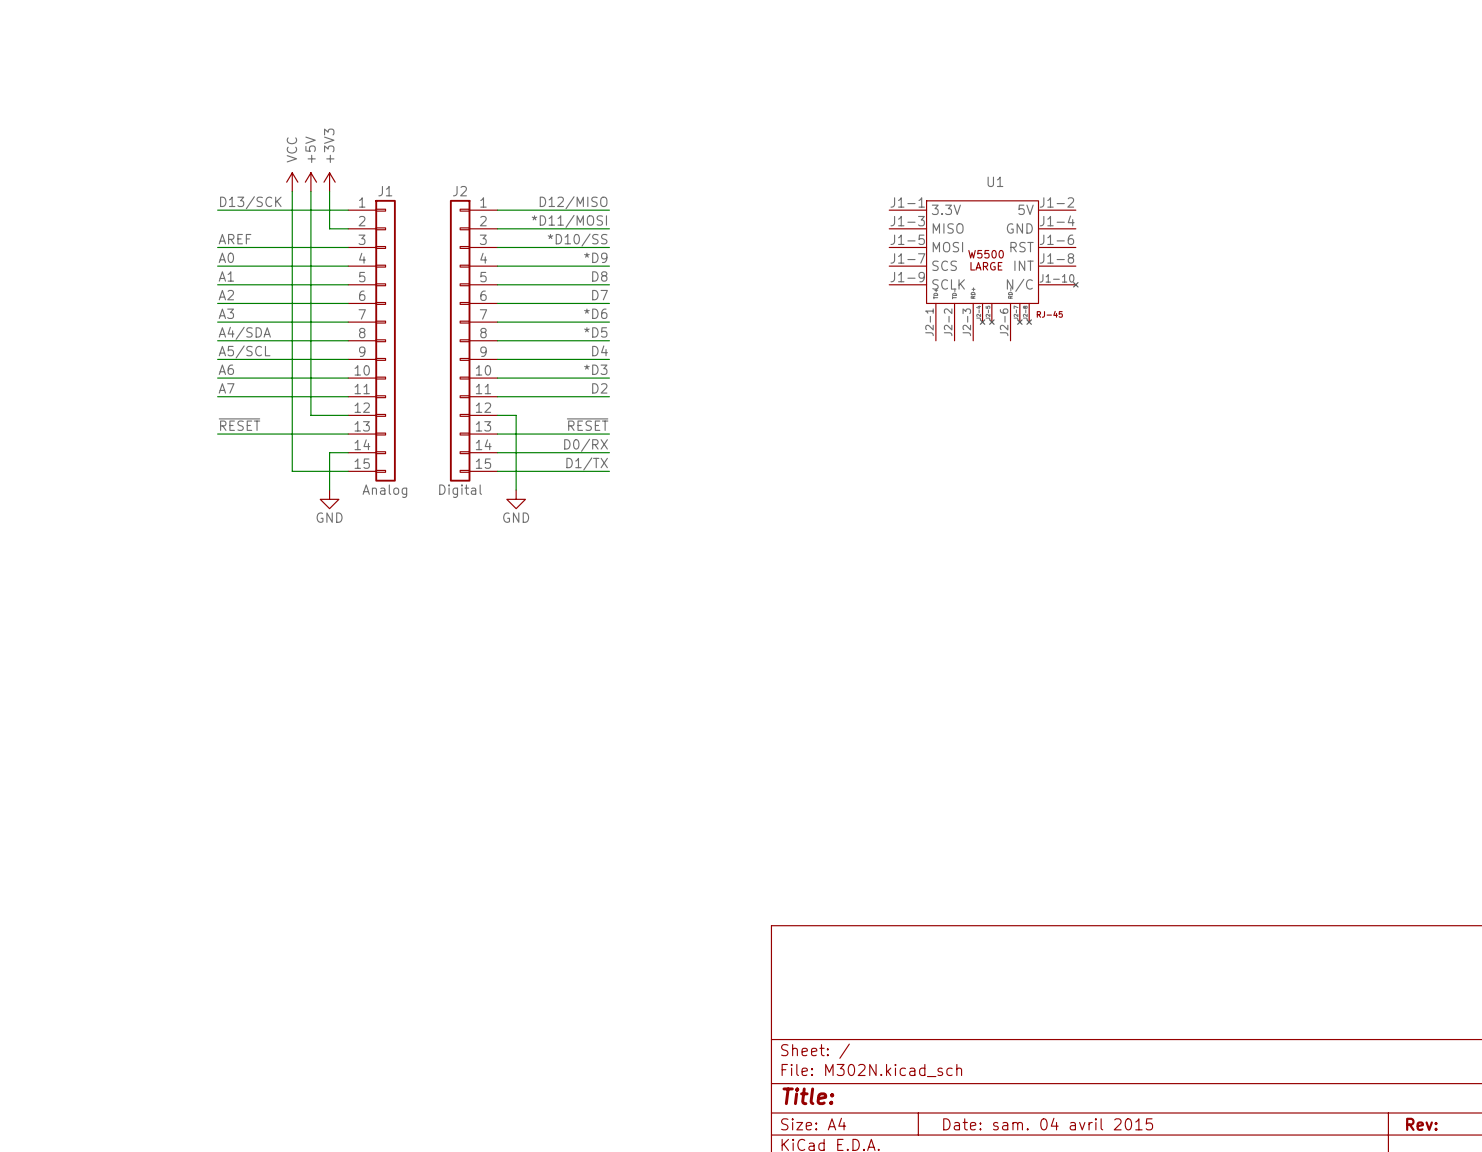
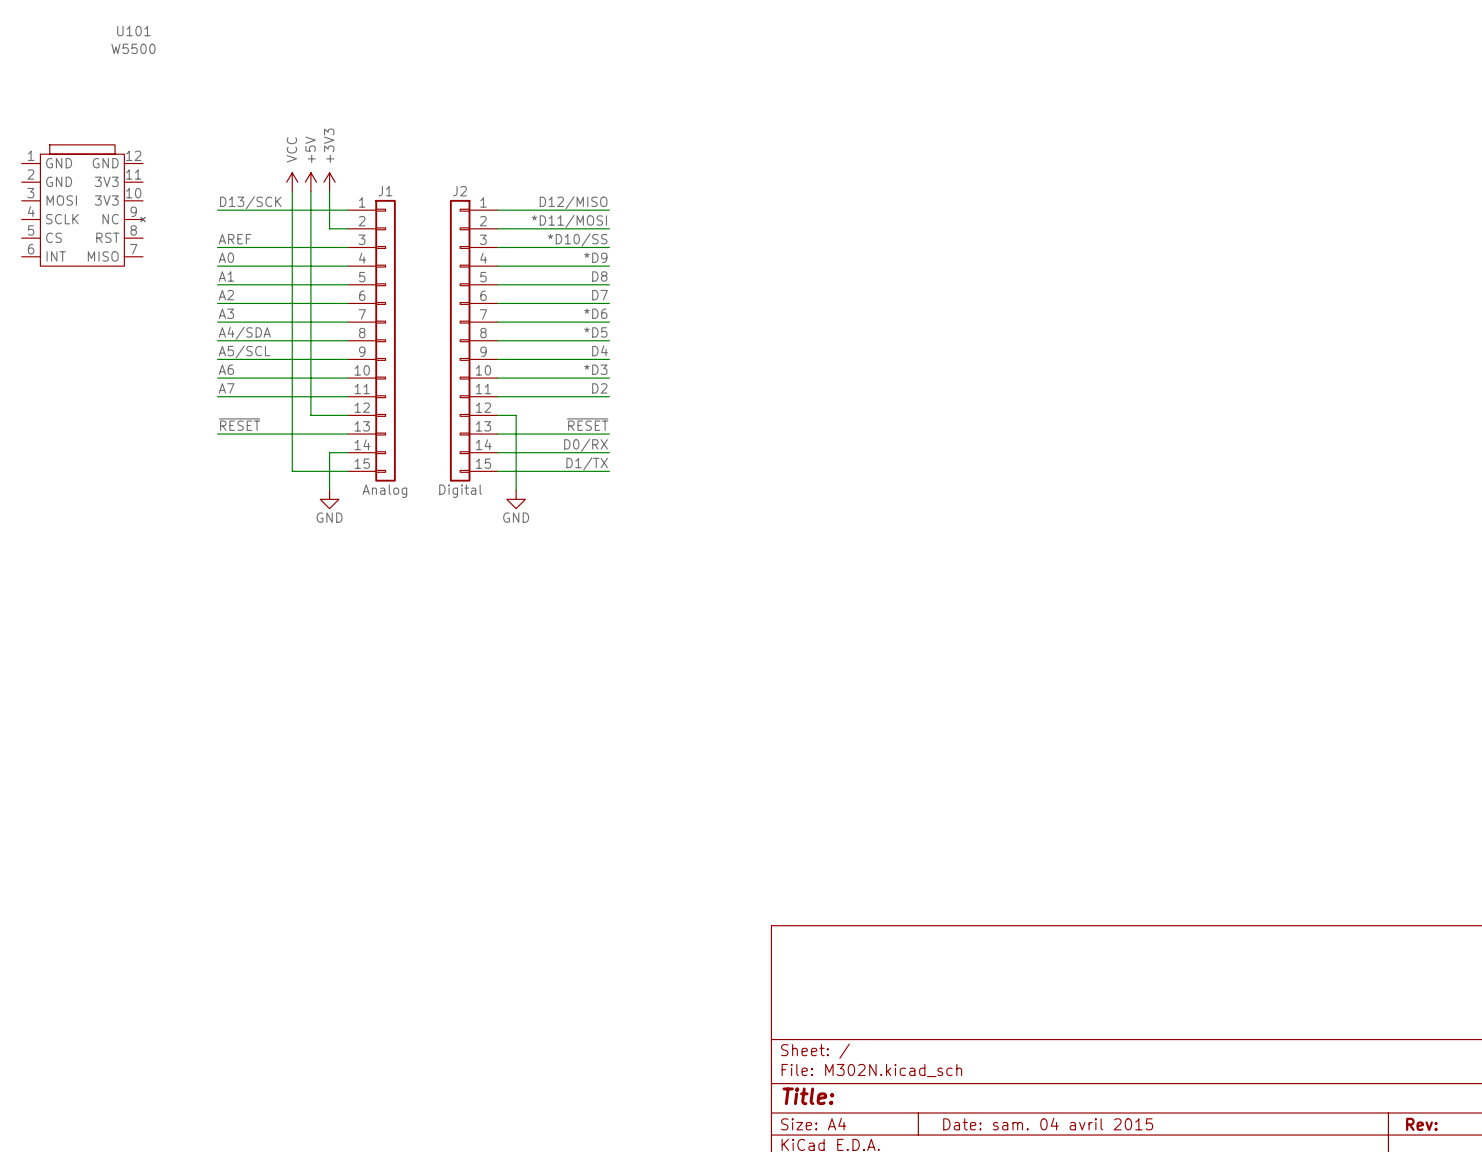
U101: none -> W5500 (124, 163)
U1: (983, 270) -> none

